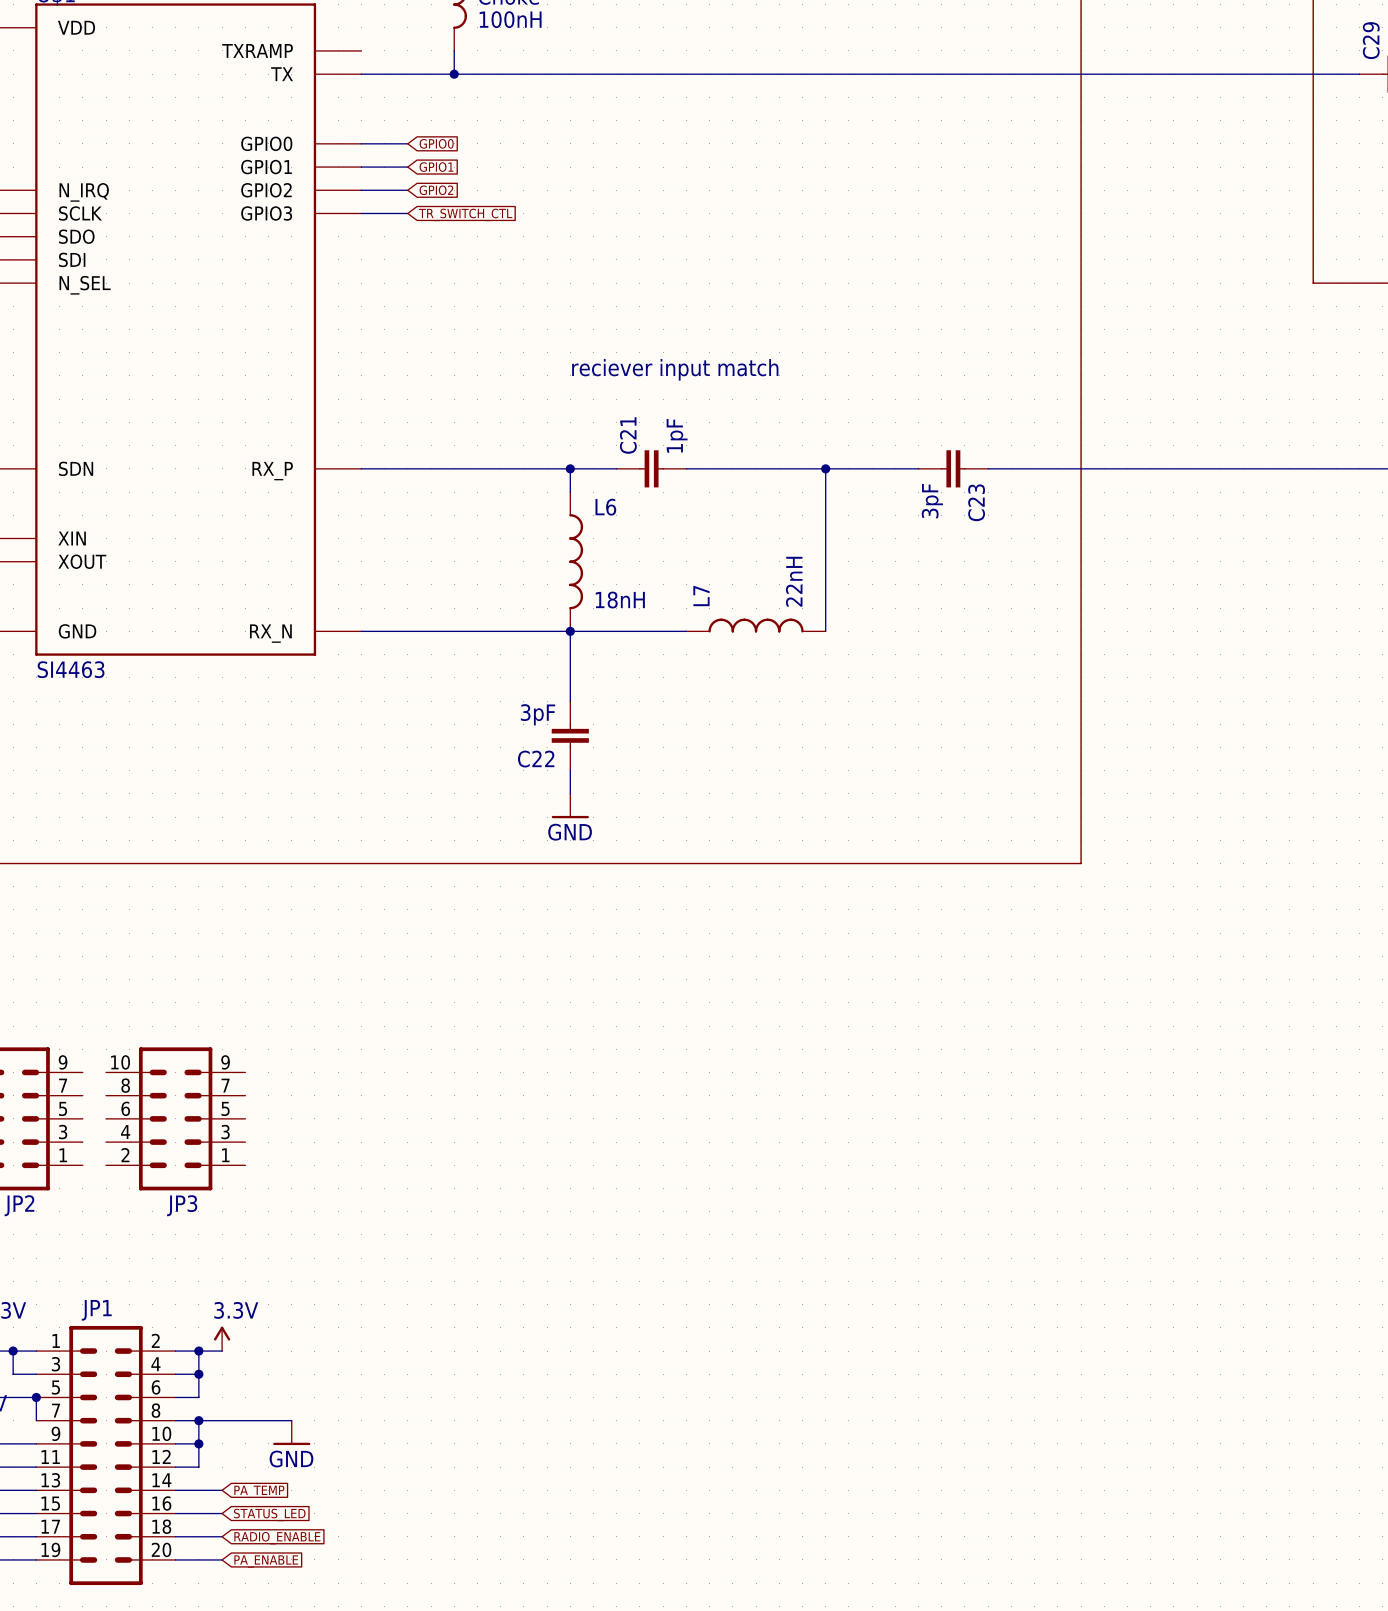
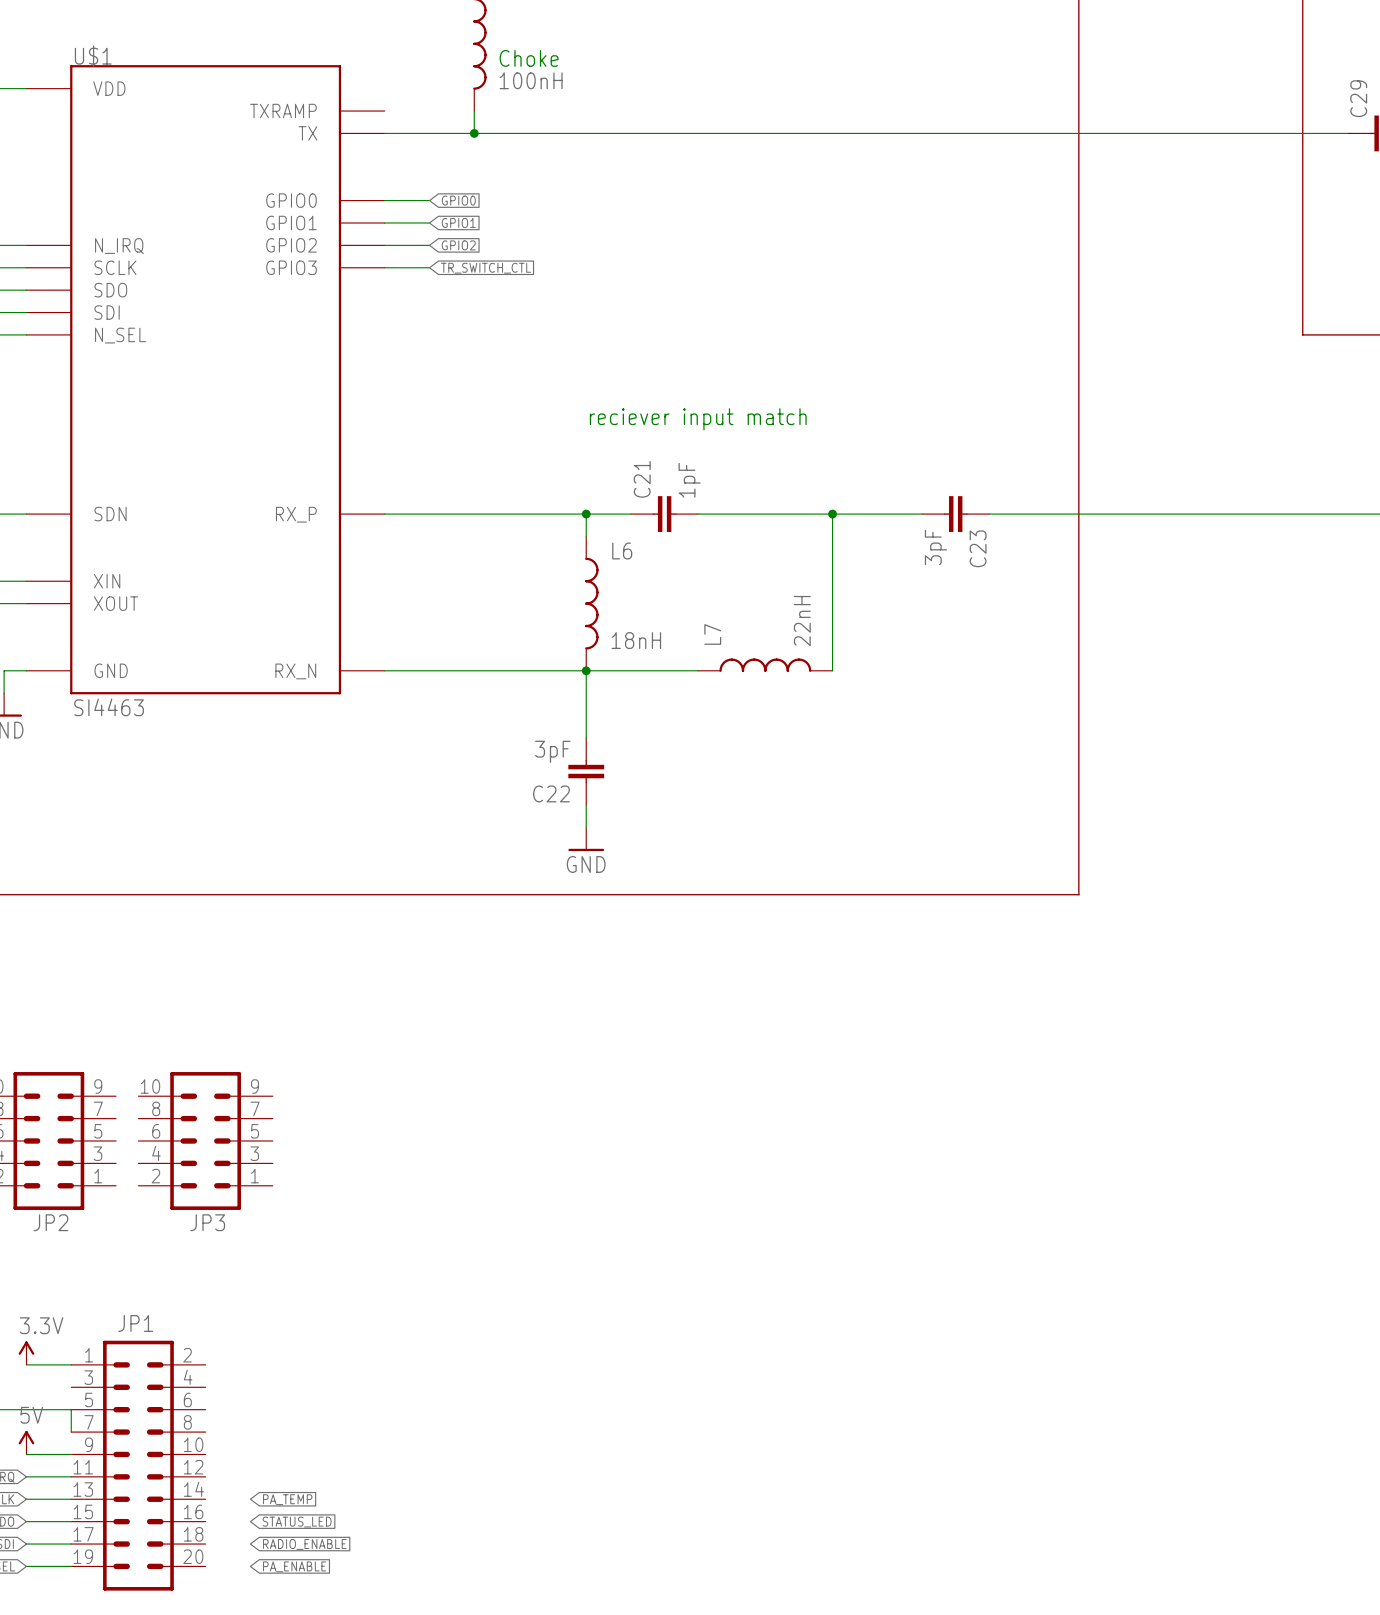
power symbol: 3.3V (222, 1338) -> none
wire: (13, 1351) (13, 1374) (36, 1374) -> none
junction: (13, 1351) -> none
wire: (175, 1351) (222, 1351) -> none
wire: (198, 1351) (198, 1397) (175, 1397) -> none
junction: (198, 1351) -> none
wire: (175, 1374) (198, 1374) -> none
junction: (198, 1374) -> none
junction: (36, 1397) -> none
wire: (175, 1420) (291, 1420) -> none
wire: (198, 1420) (198, 1467) (175, 1467) -> none
junction: (198, 1420) -> none
power symbol: GND (291, 1432) -> none
wire: (175, 1443) (198, 1443) -> none
junction: (198, 1443) -> none
wire: (175, 1490) (222, 1490) -> none
wire: (175, 1513) (222, 1513) -> none
wire: (175, 1536) (222, 1536) -> none
wire: (175, 1559) (222, 1559) -> none

